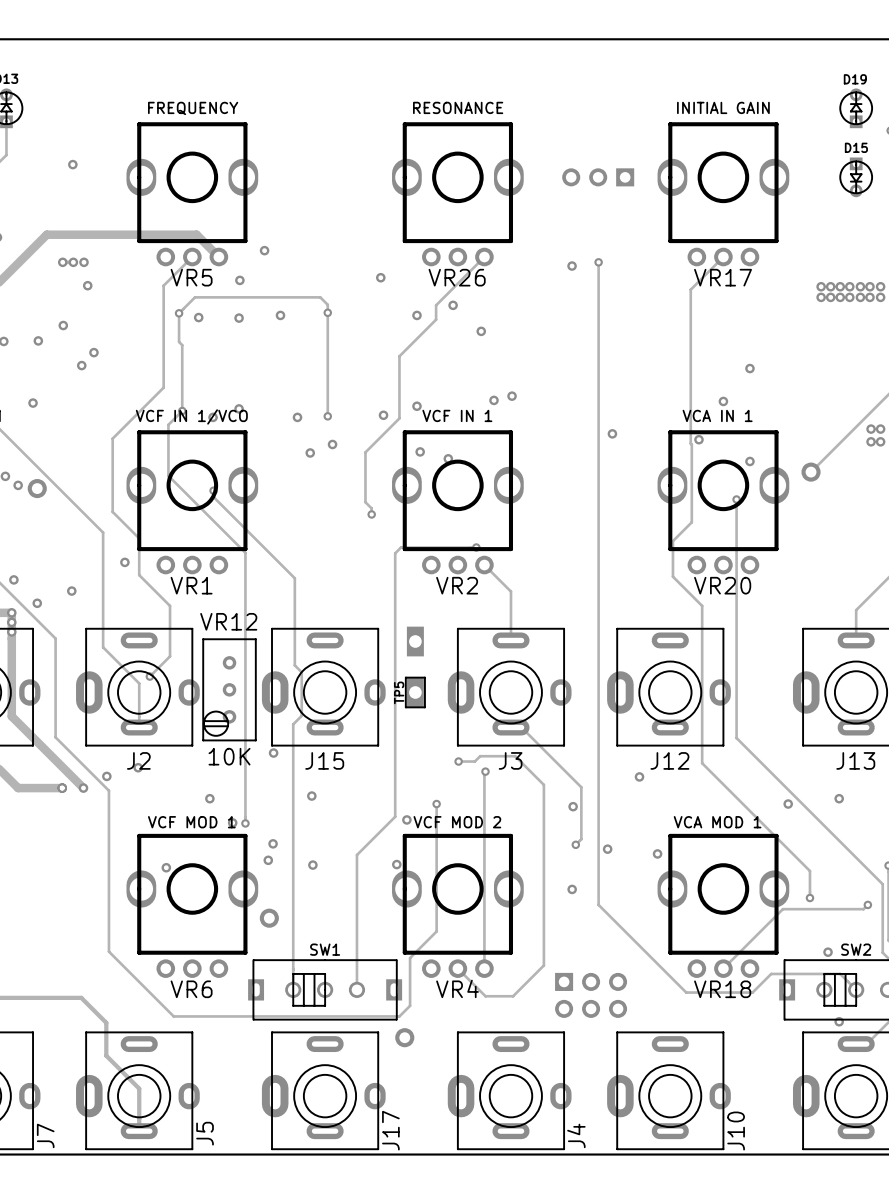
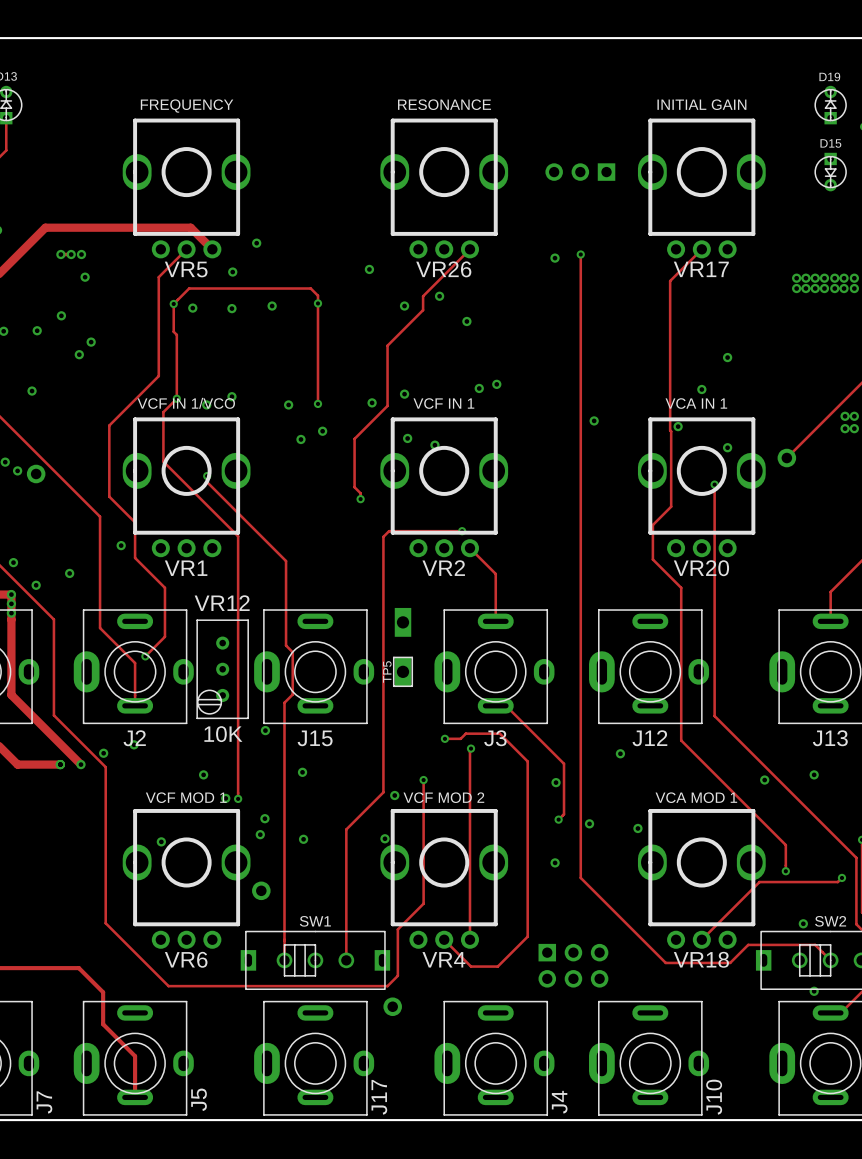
via: (72, 164) -> none

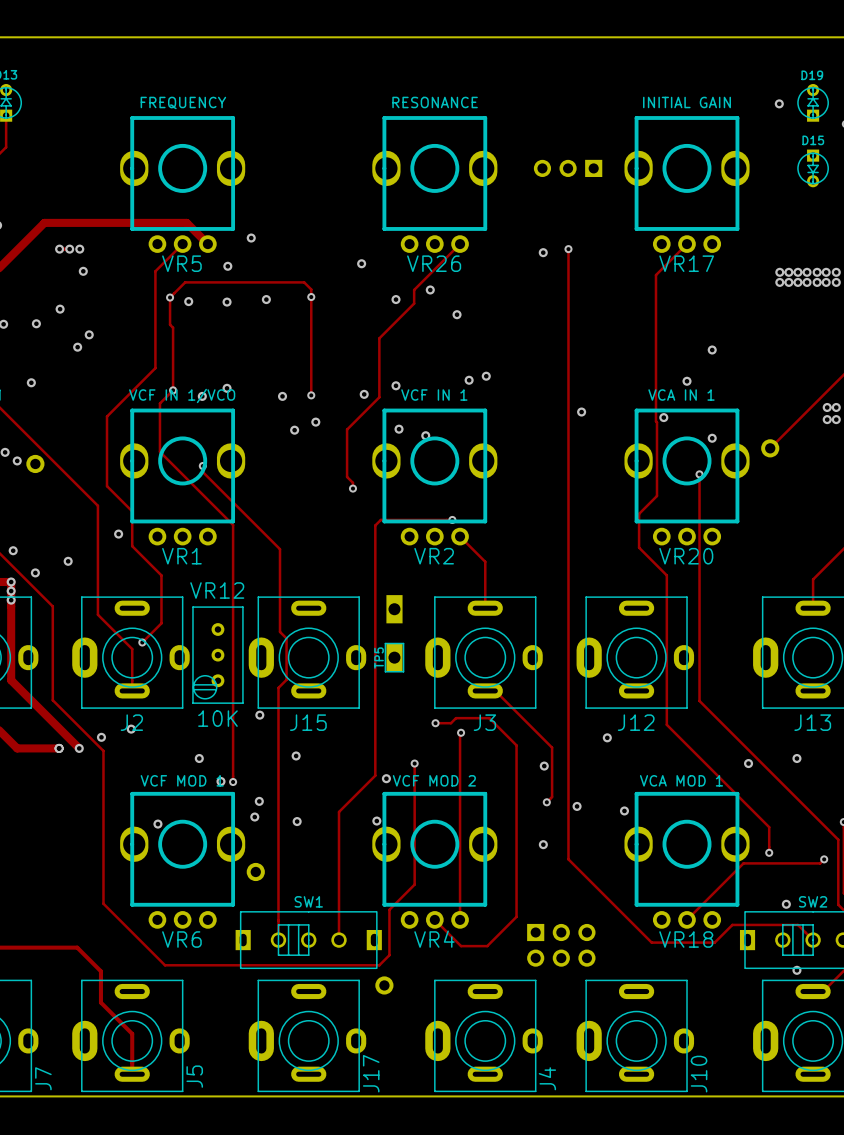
via: none -> (779, 103)

